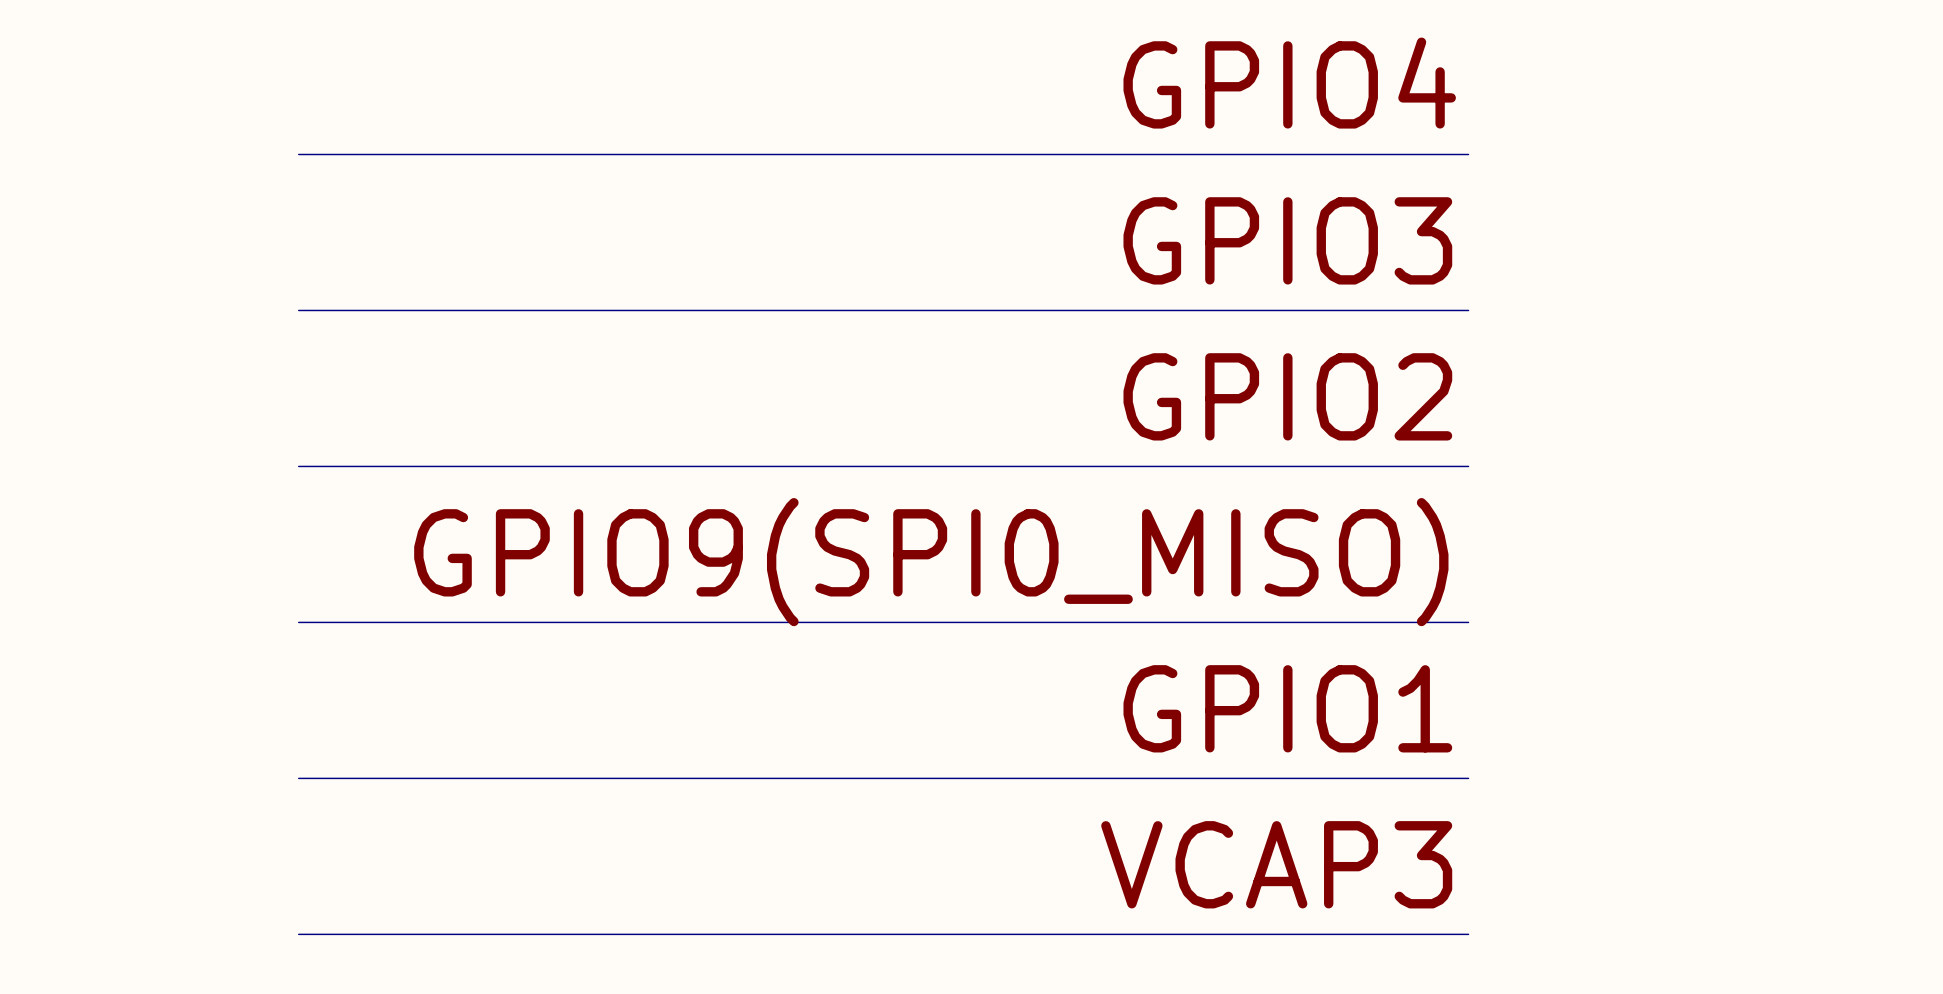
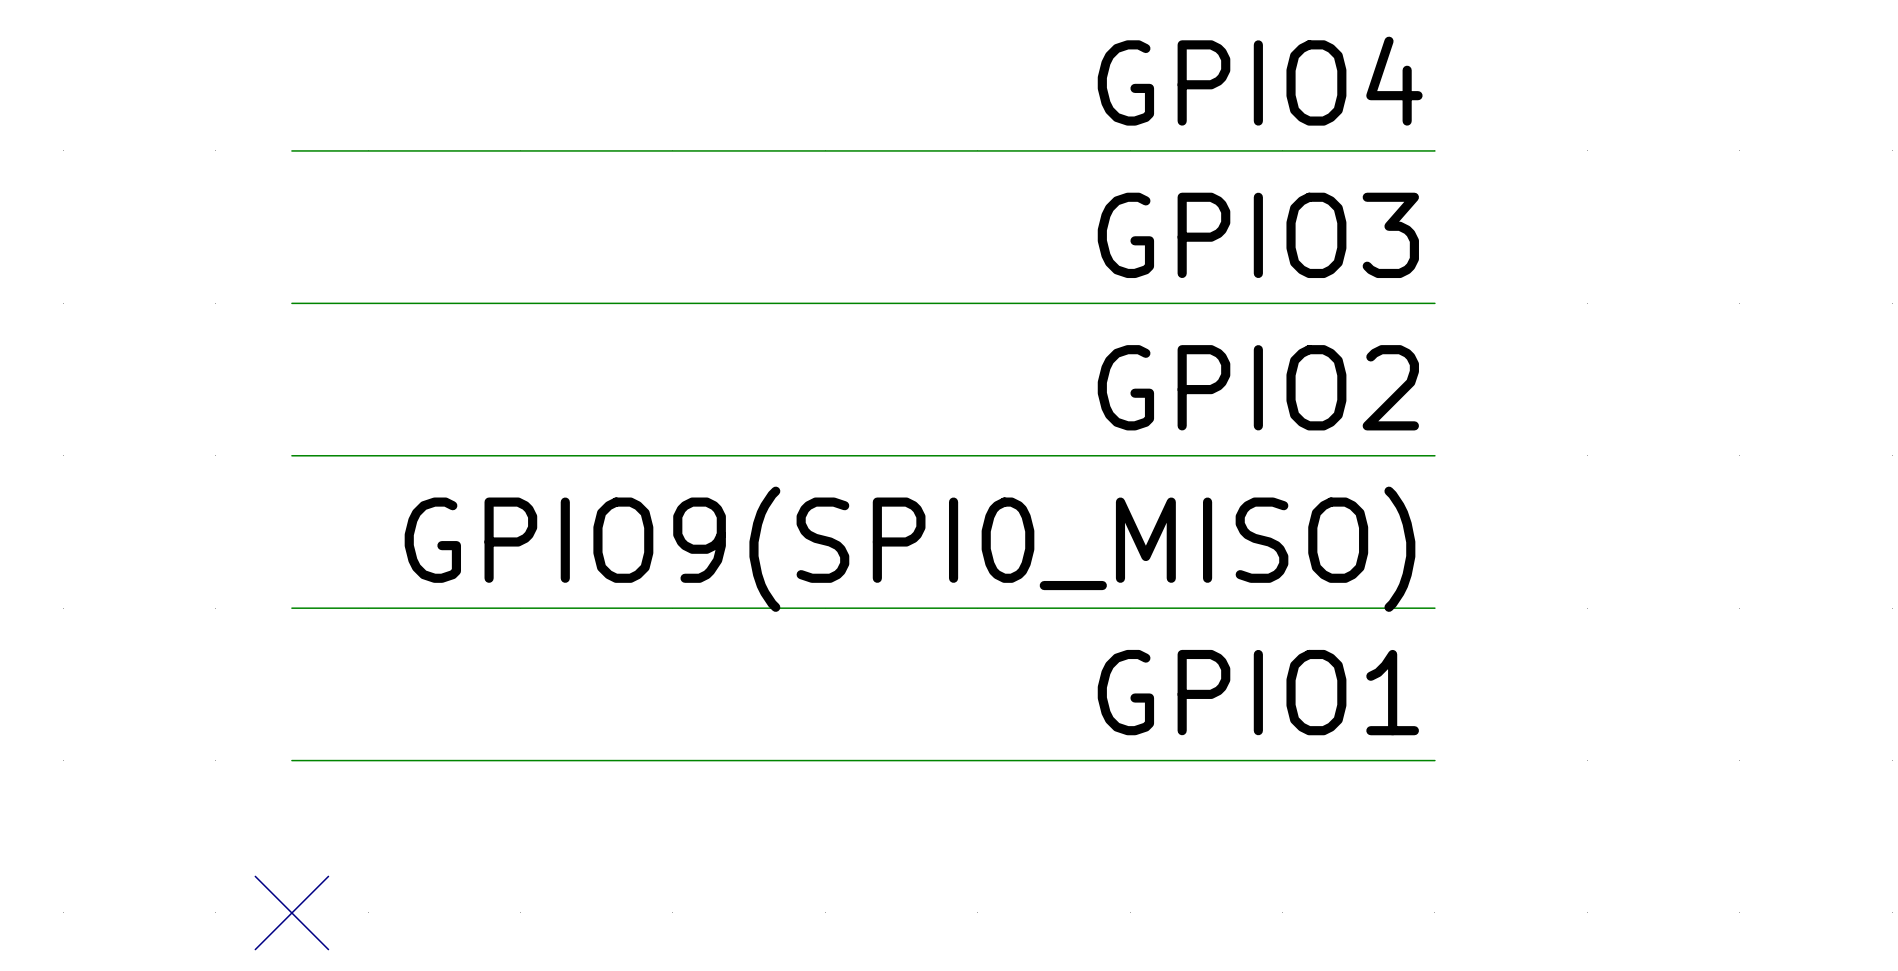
label: VCAP3 (1276, 864) -> none
wire: (298, 934) (1468, 934) -> none
no-connect mark: none -> (291, 912)

